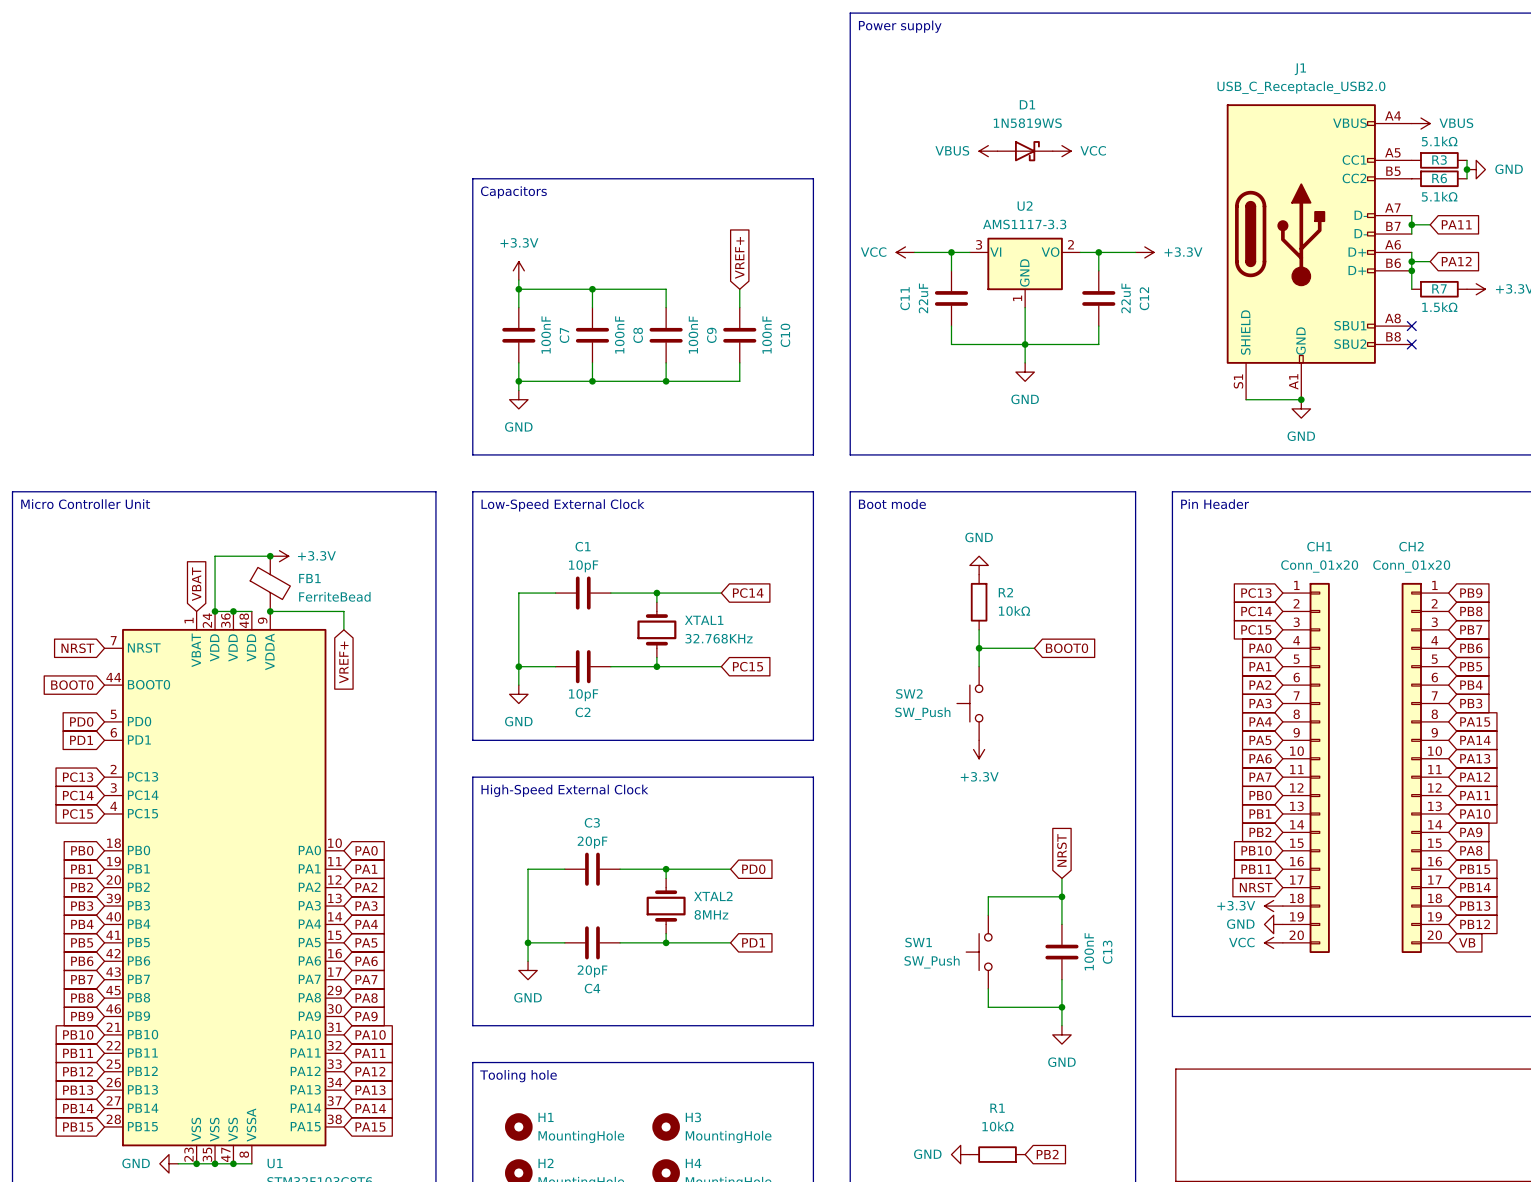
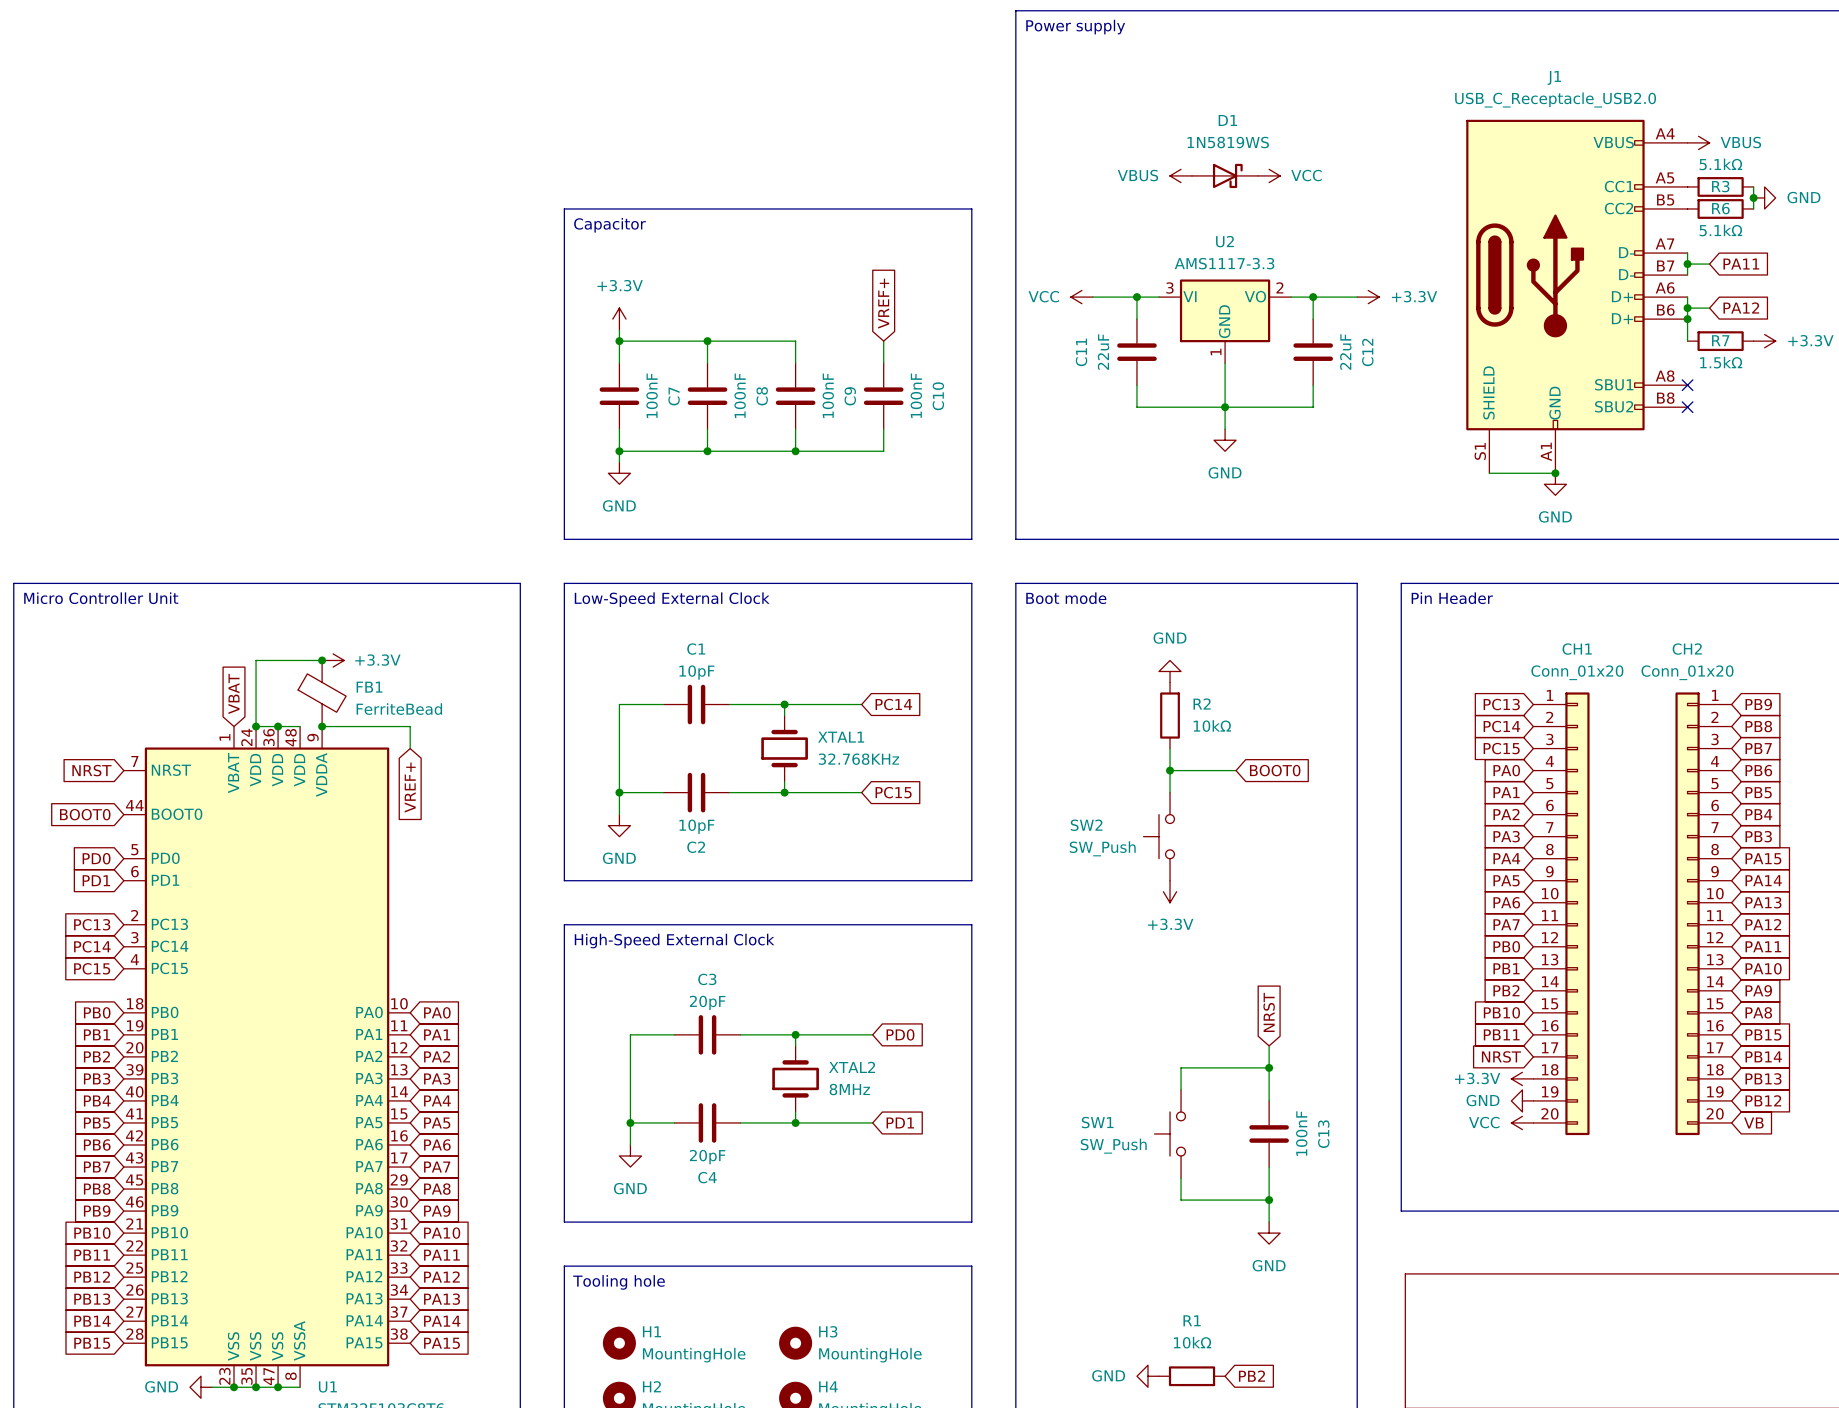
text: Capacitors (513, 192) -> Capacitor (609, 225)

